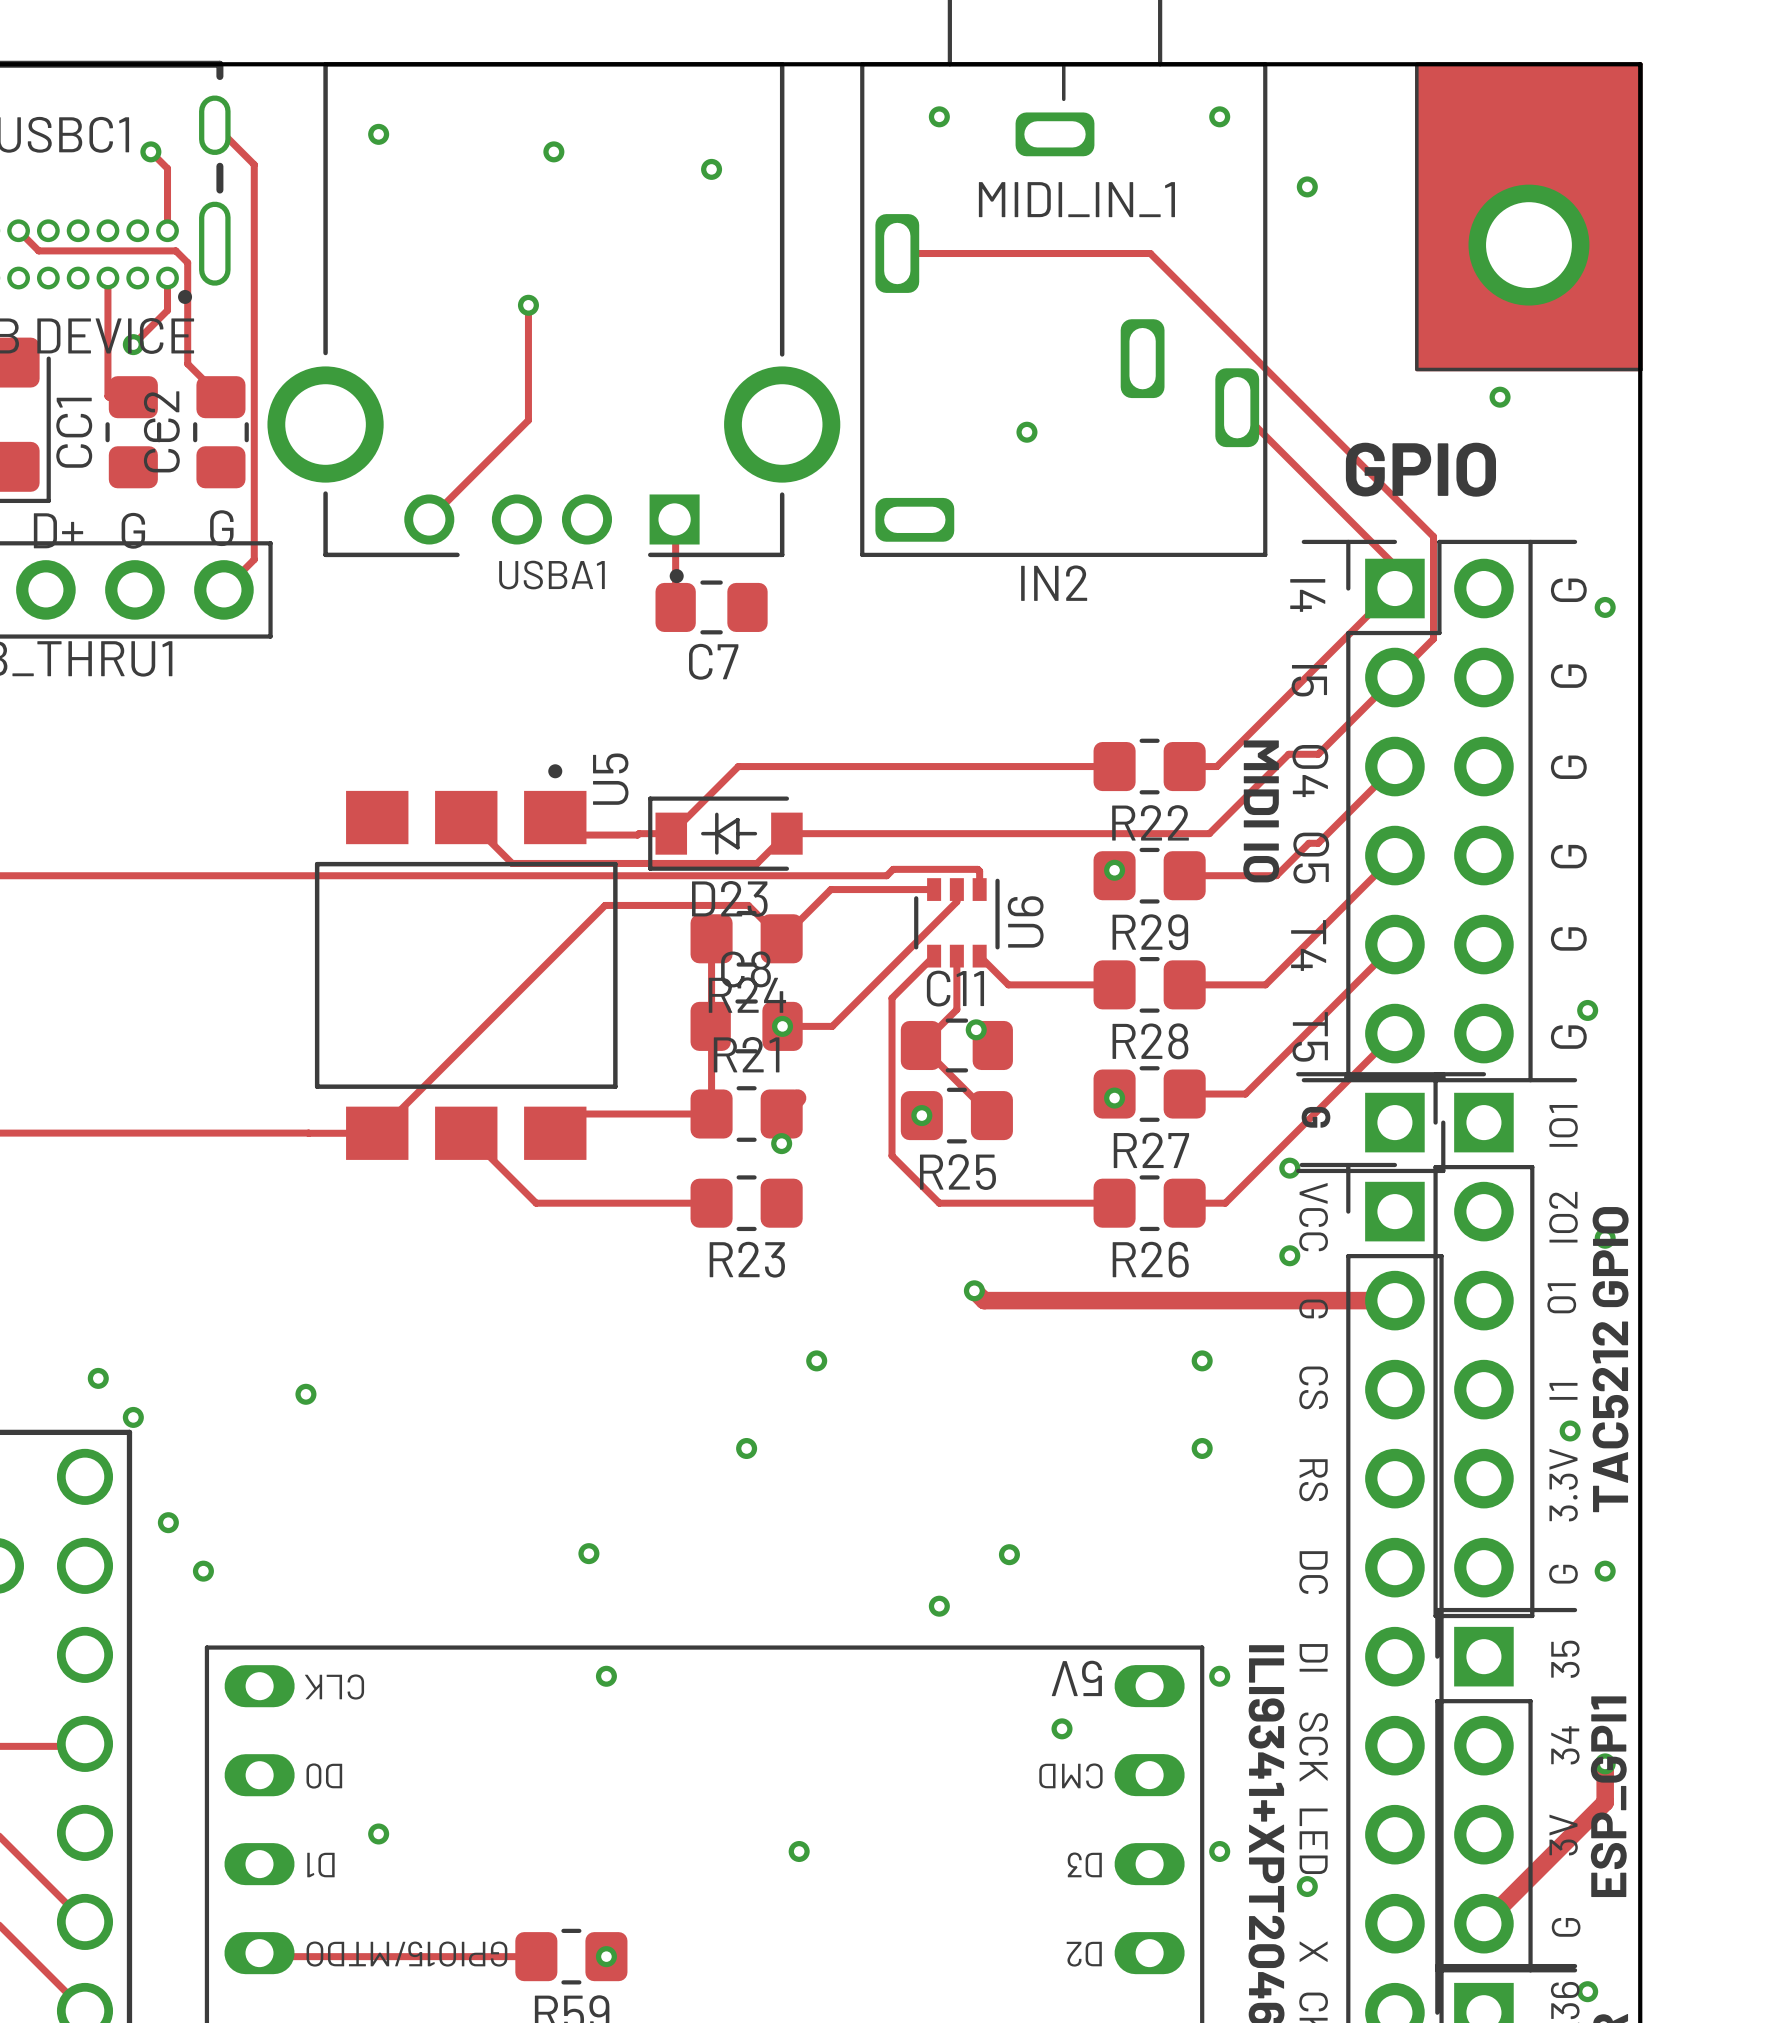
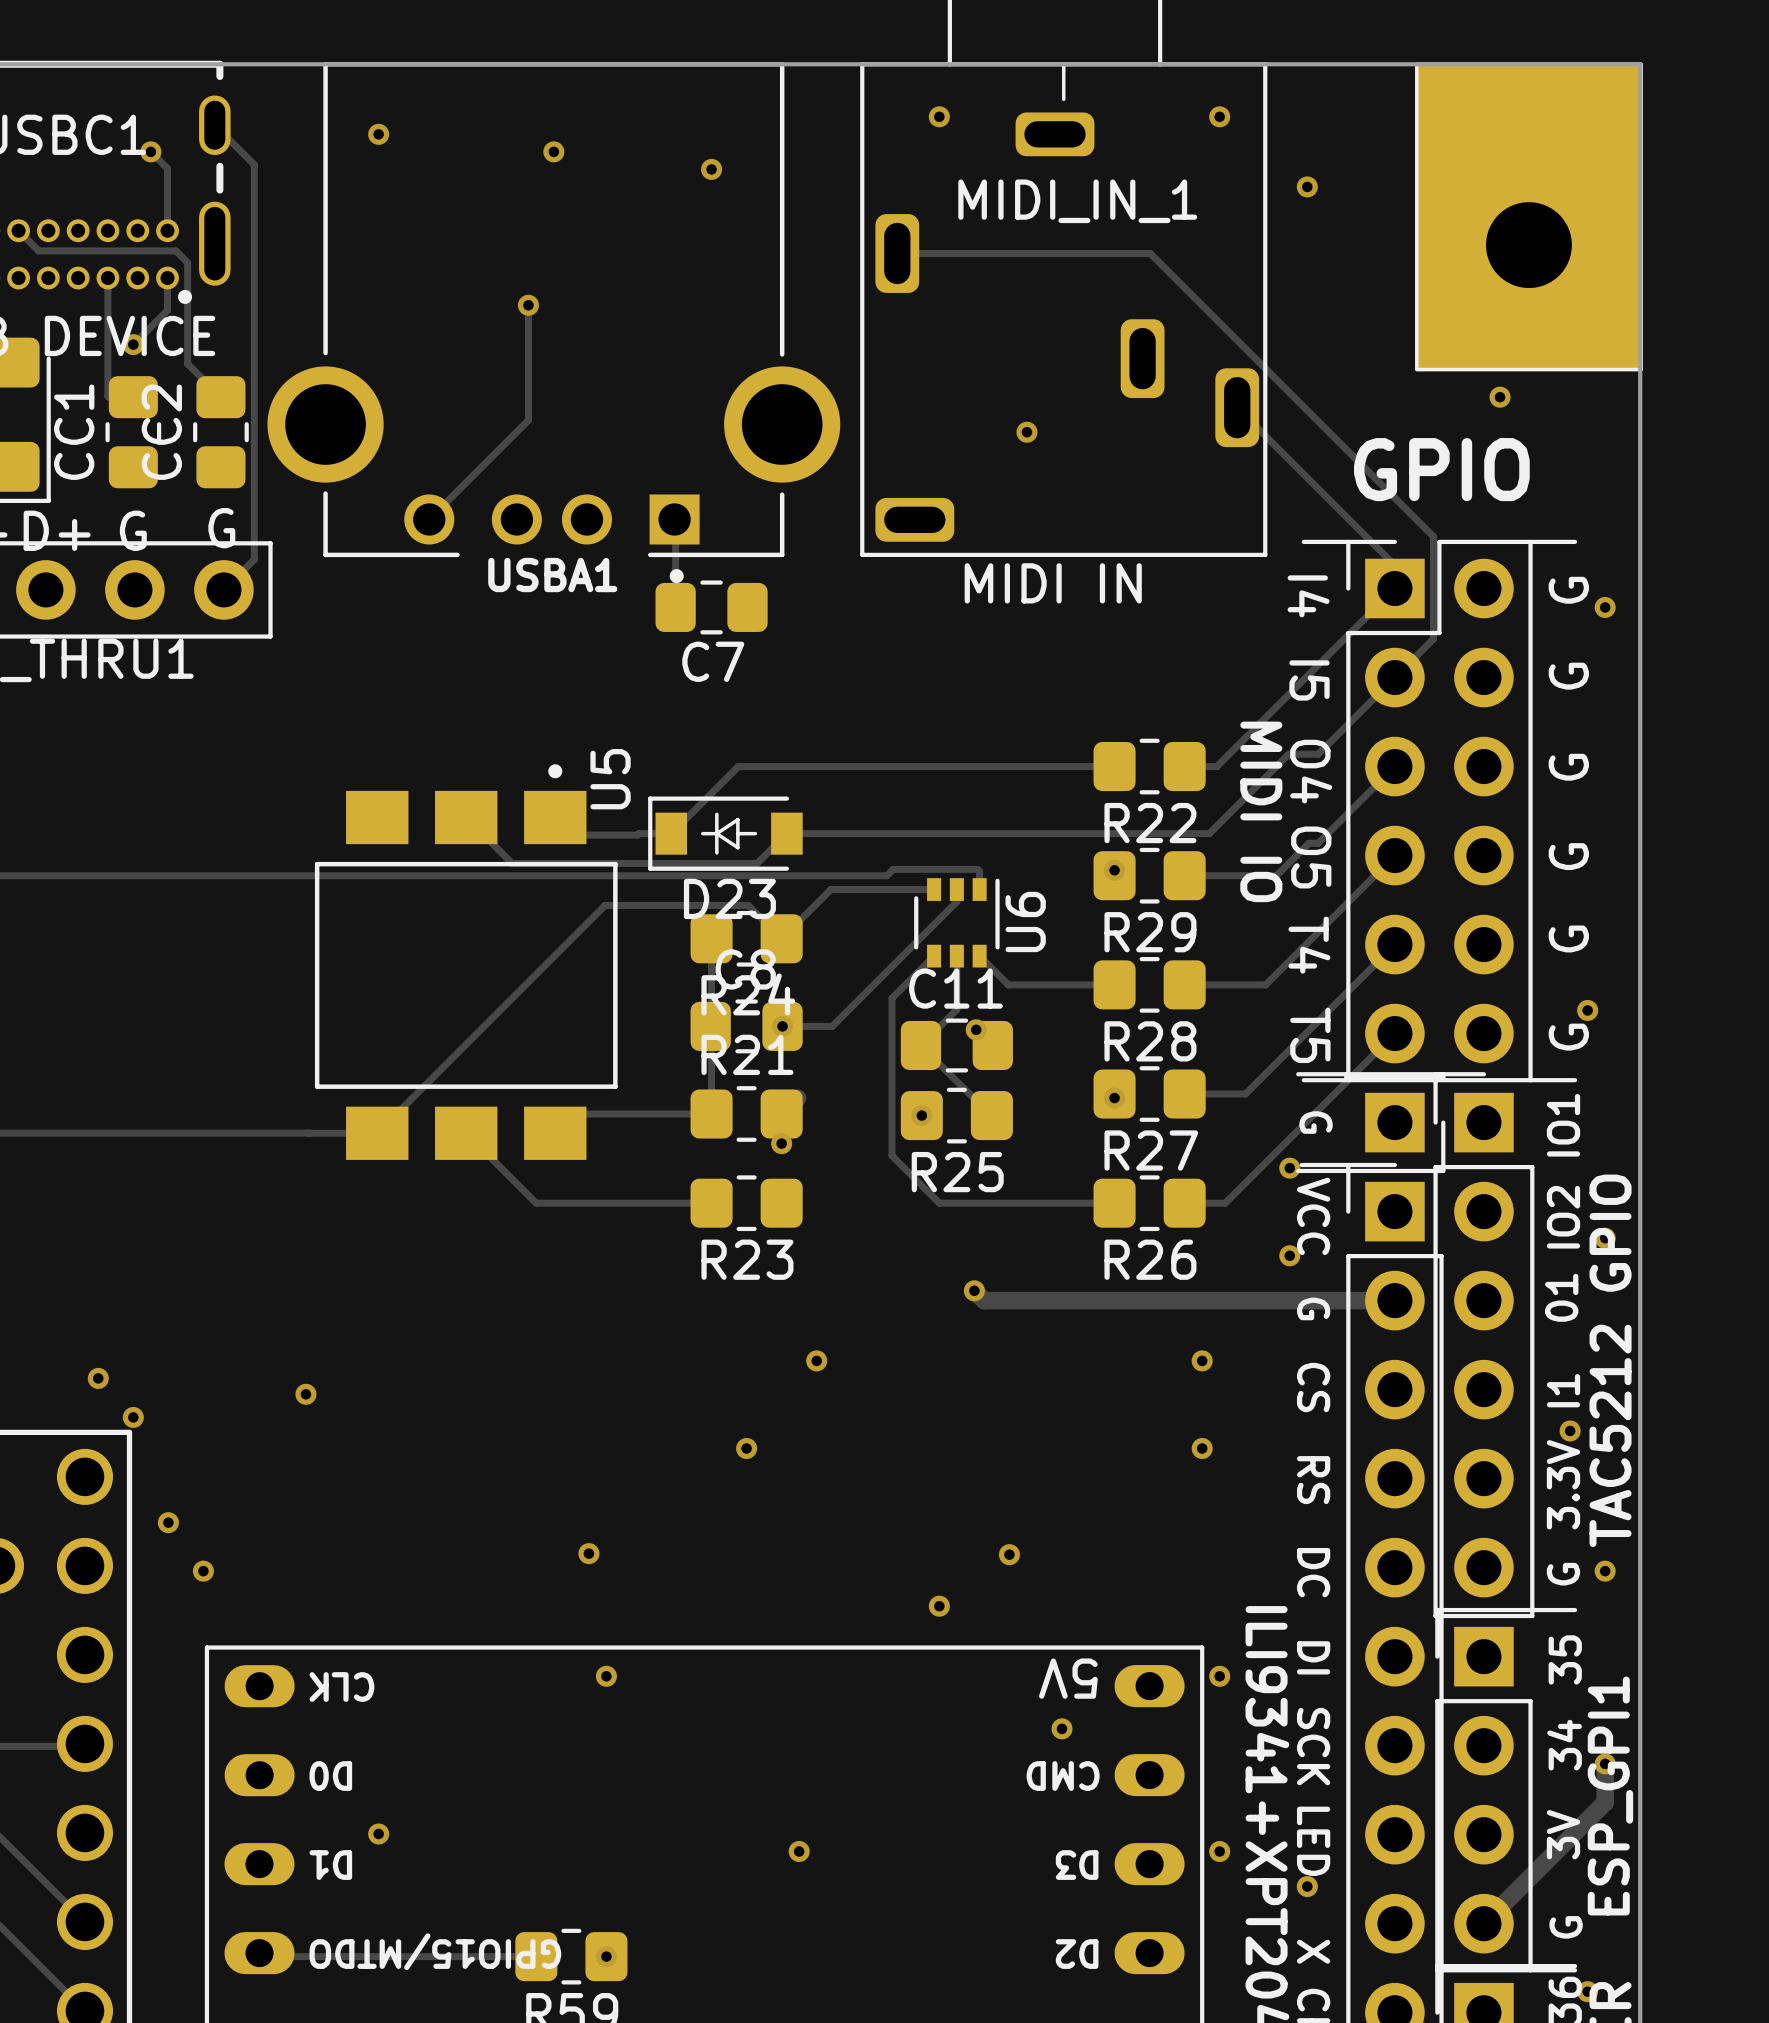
MIDI_IN_1 text: IN2 (1054, 583) -> MIDI IN (1053, 583)

